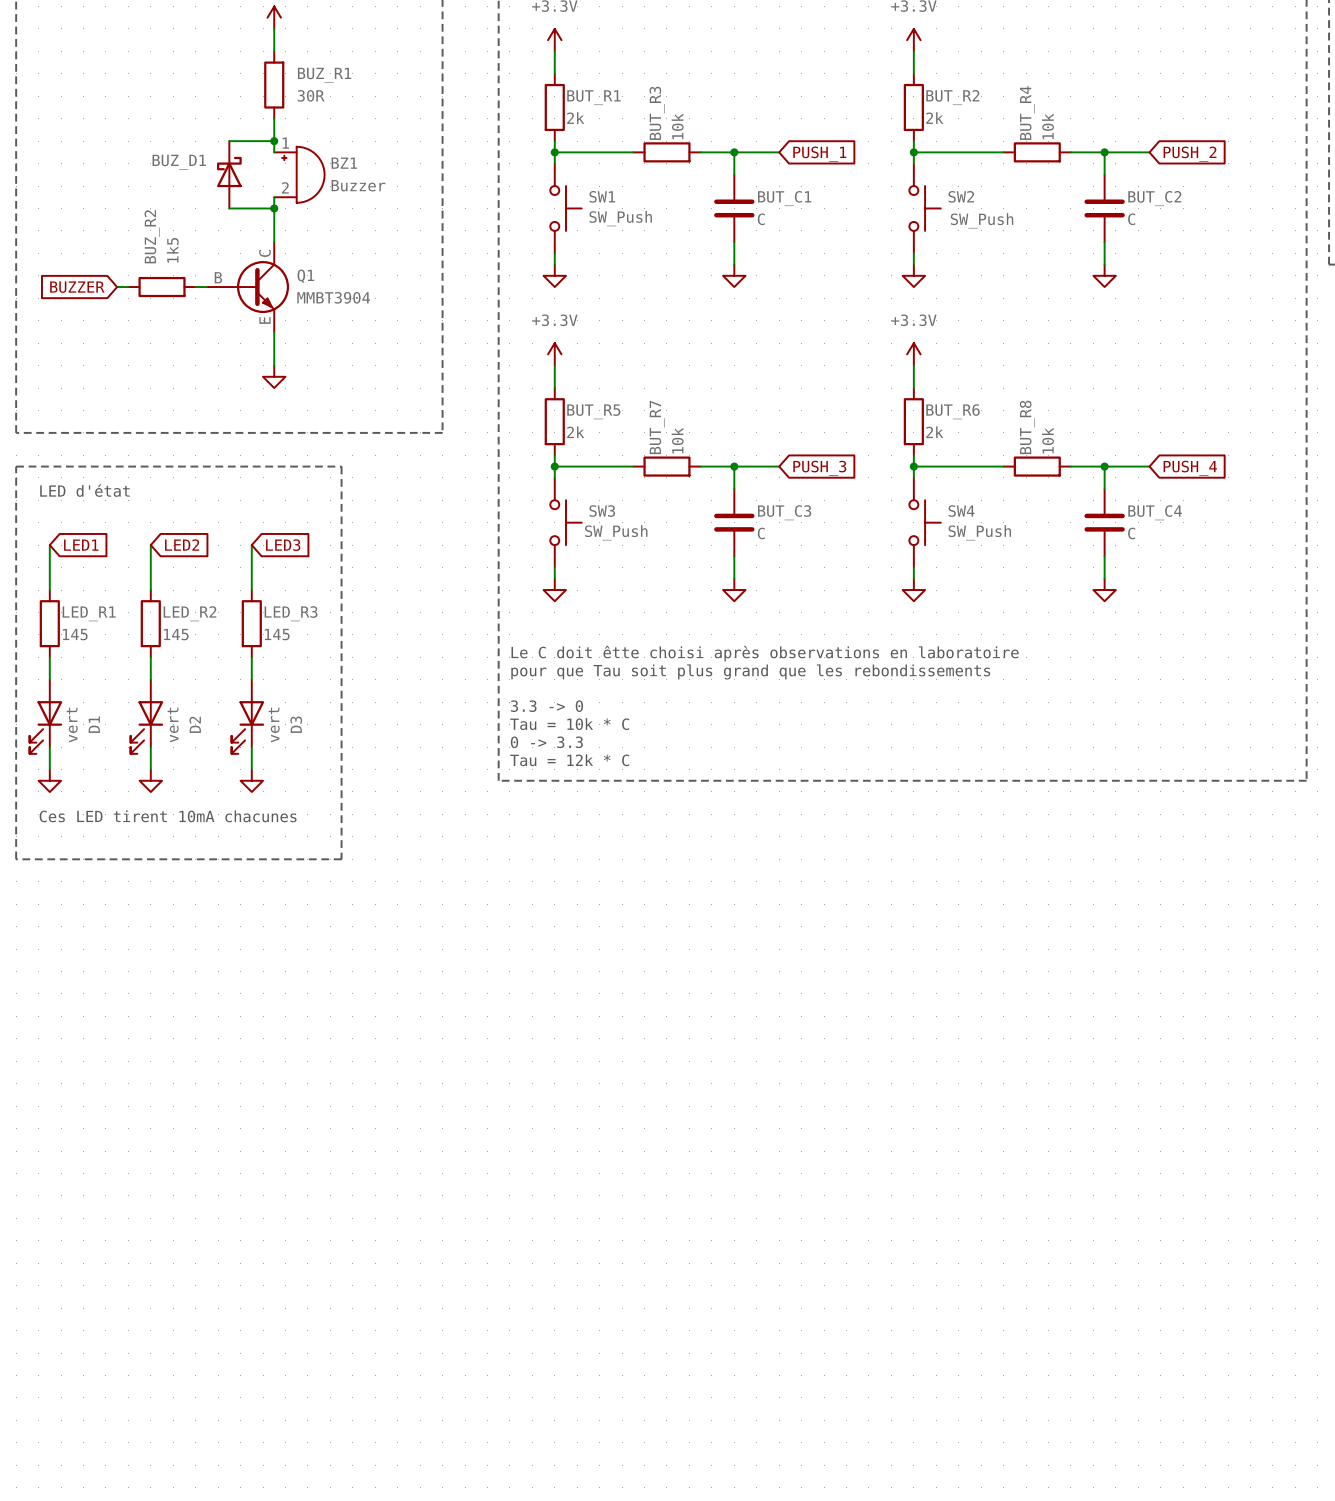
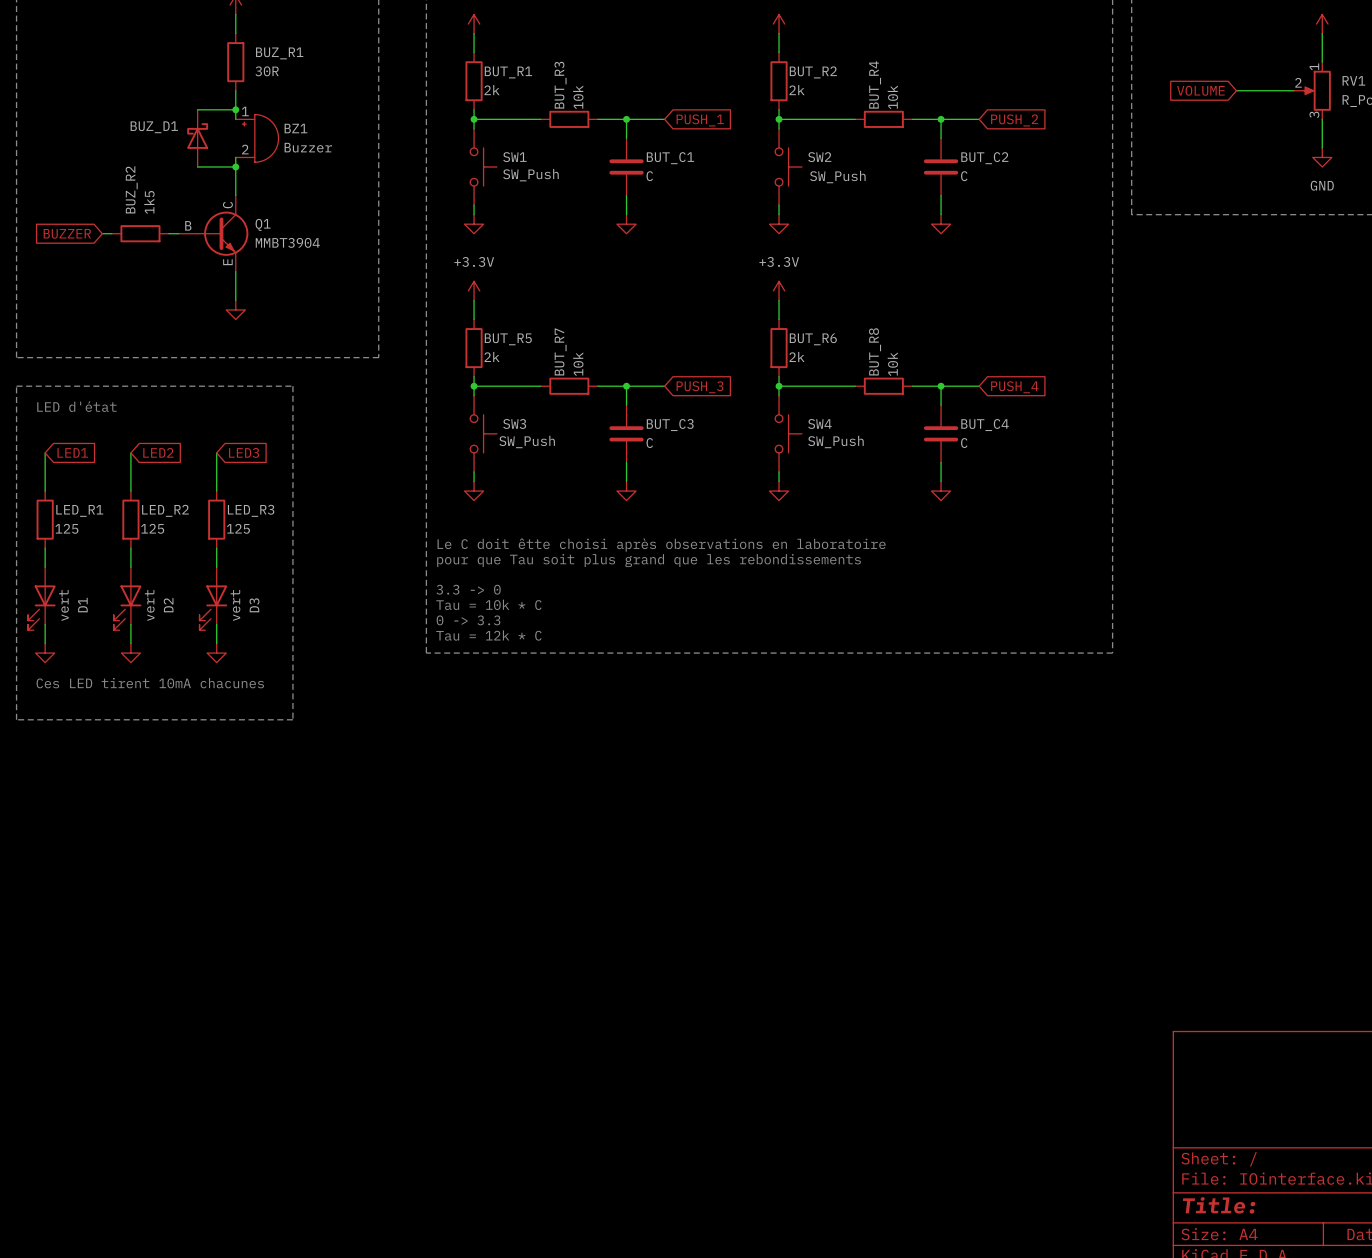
LED_R1 value: 145 (75, 634) -> 125 (66, 528)
LED_R2 value: 145 (176, 634) -> 125 (152, 528)
LED_R3 value: 145 (277, 634) -> 125 (238, 528)

